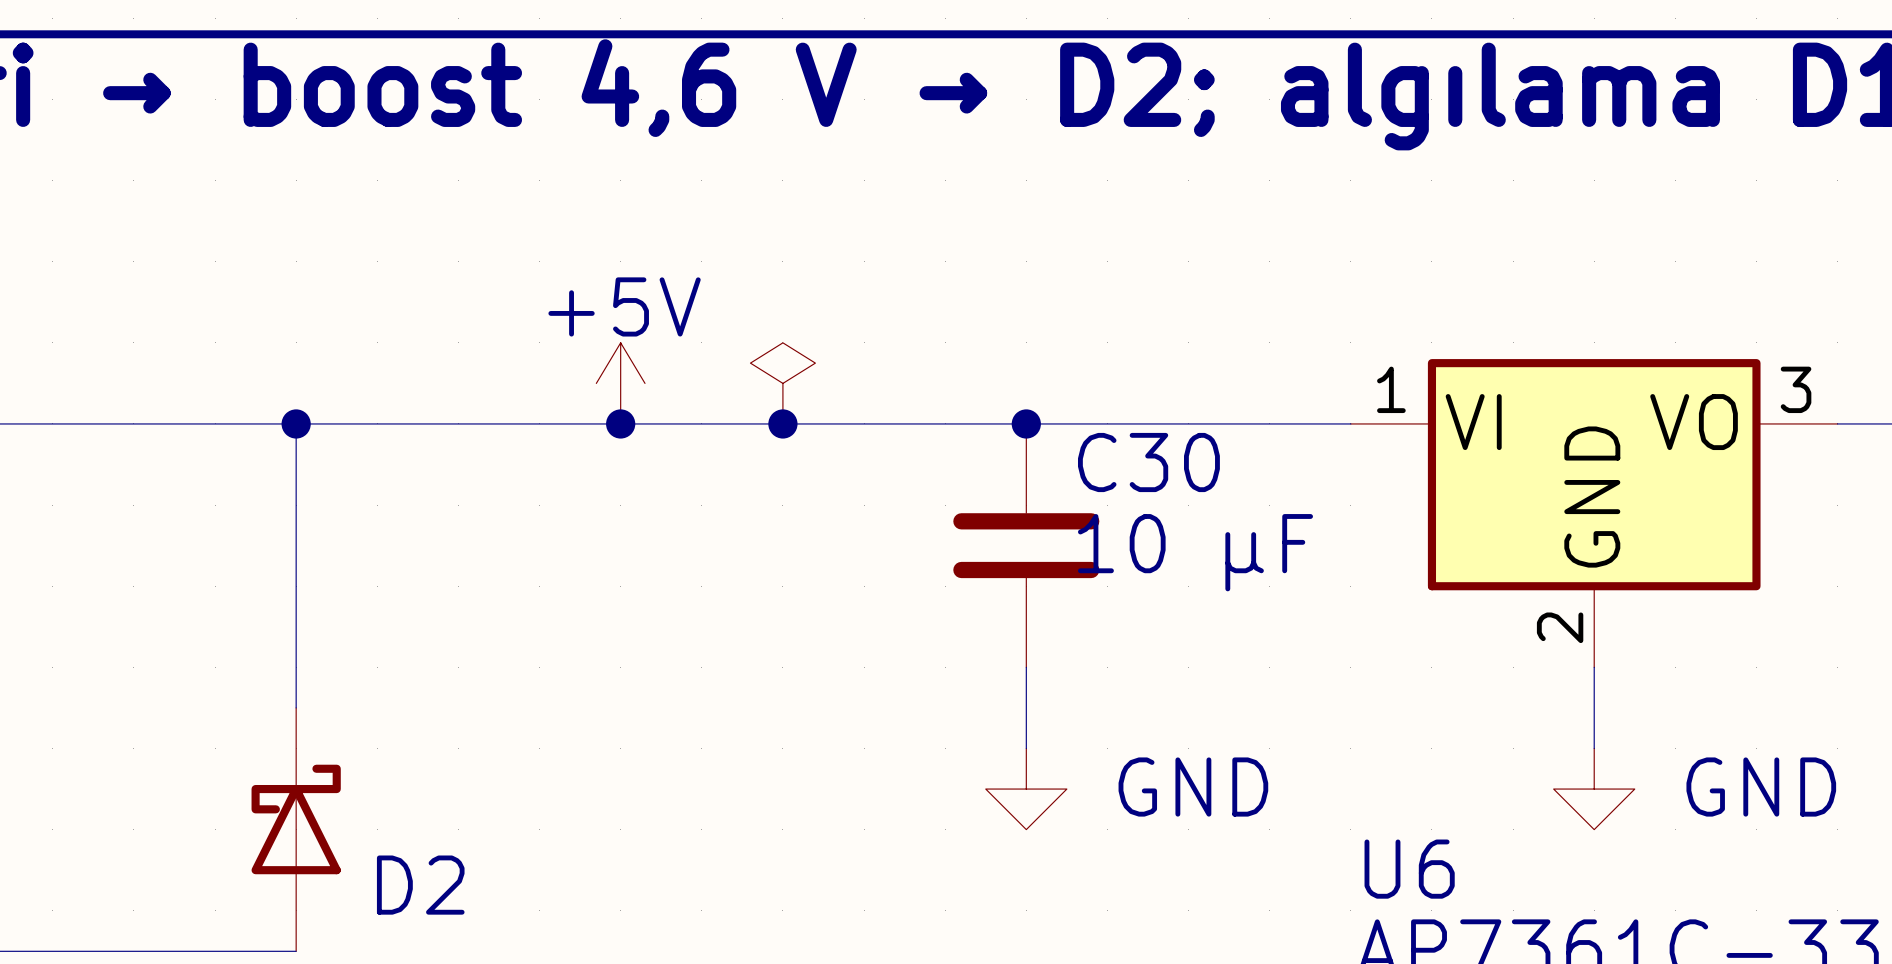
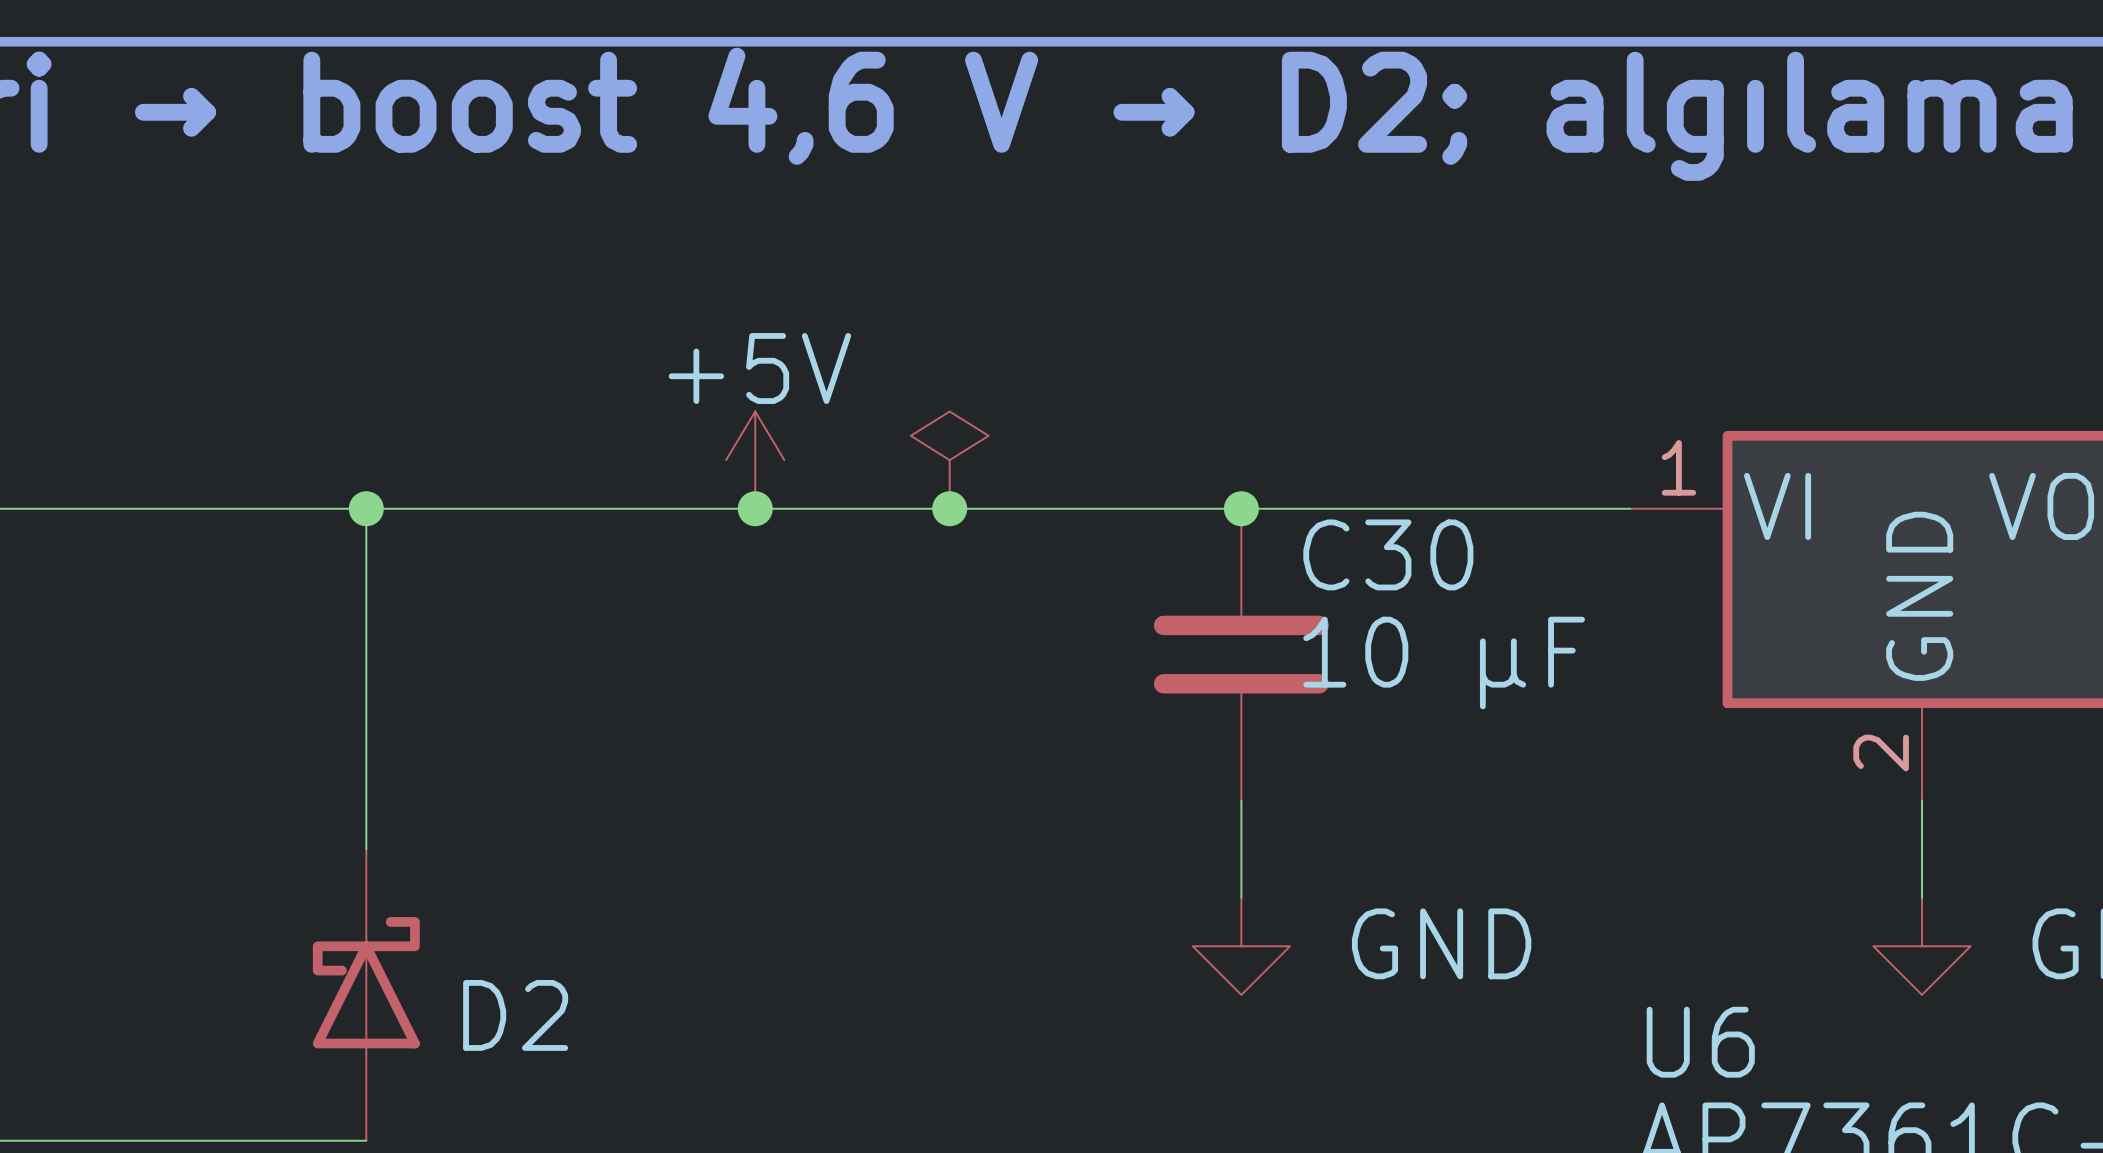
D2 name position: D2 (420, 885) -> D2 (515, 1015)

